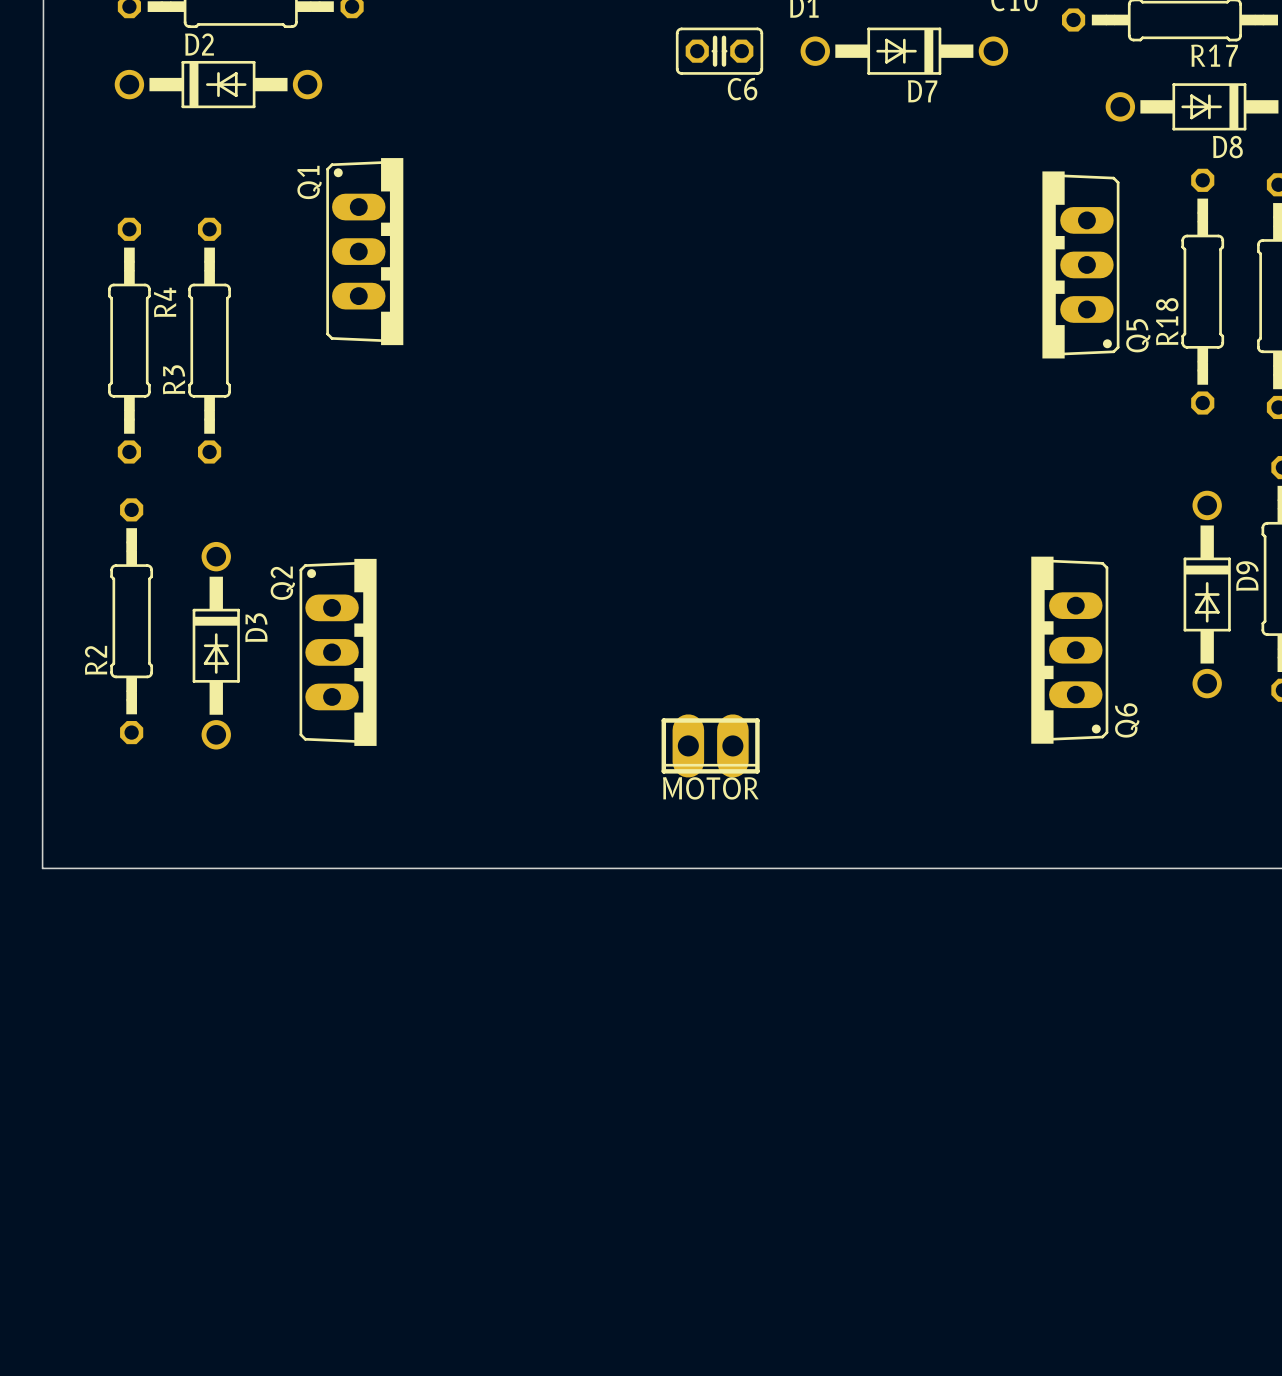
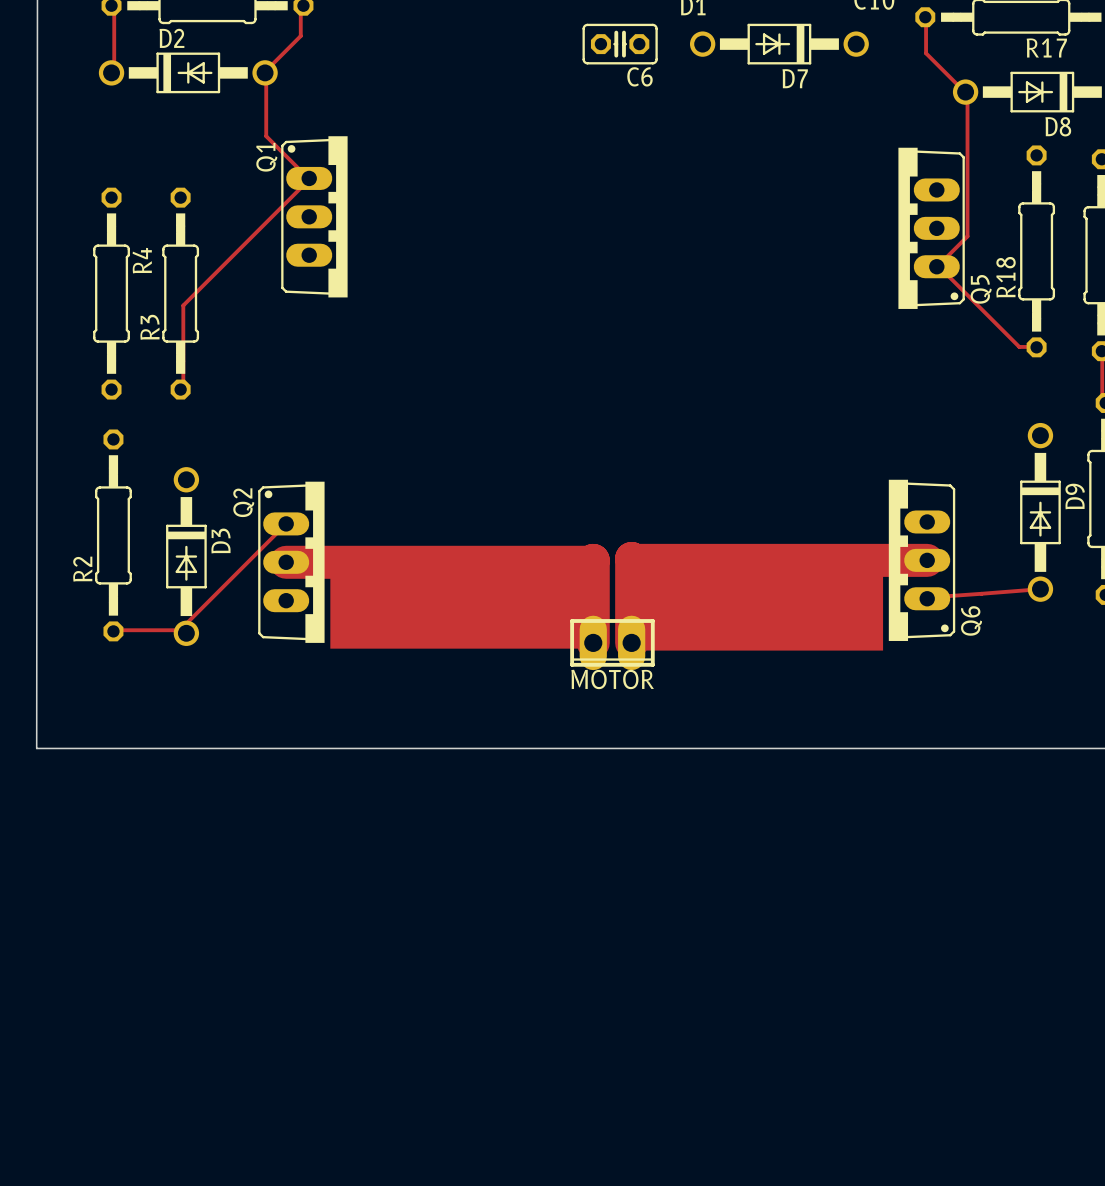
track: none -> (303, 5) (300, 8) (300, 36) (265, 72) (266, 136) (309, 178) (183, 305) (183, 388) (180, 389)
track: none -> (114, 8) (114, 70)
track: none -> (925, 17) (926, 53) (967, 94) (967, 236) (936, 266) (939, 267) (1019, 346) (1036, 347)
track: none -> (1102, 353) (1102, 398)
track: none -> (286, 523) (186, 623)
track: none -> (927, 560) (633, 560) (631, 558) (631, 642)
track: none -> (286, 561) (591, 562) (593, 560) (593, 642)
drawing: none -> [330, 564, 590, 649]
drawing: none -> [641, 569, 884, 651]
track: none -> (1040, 589) (927, 598)
track: none -> (114, 630) (183, 630)

